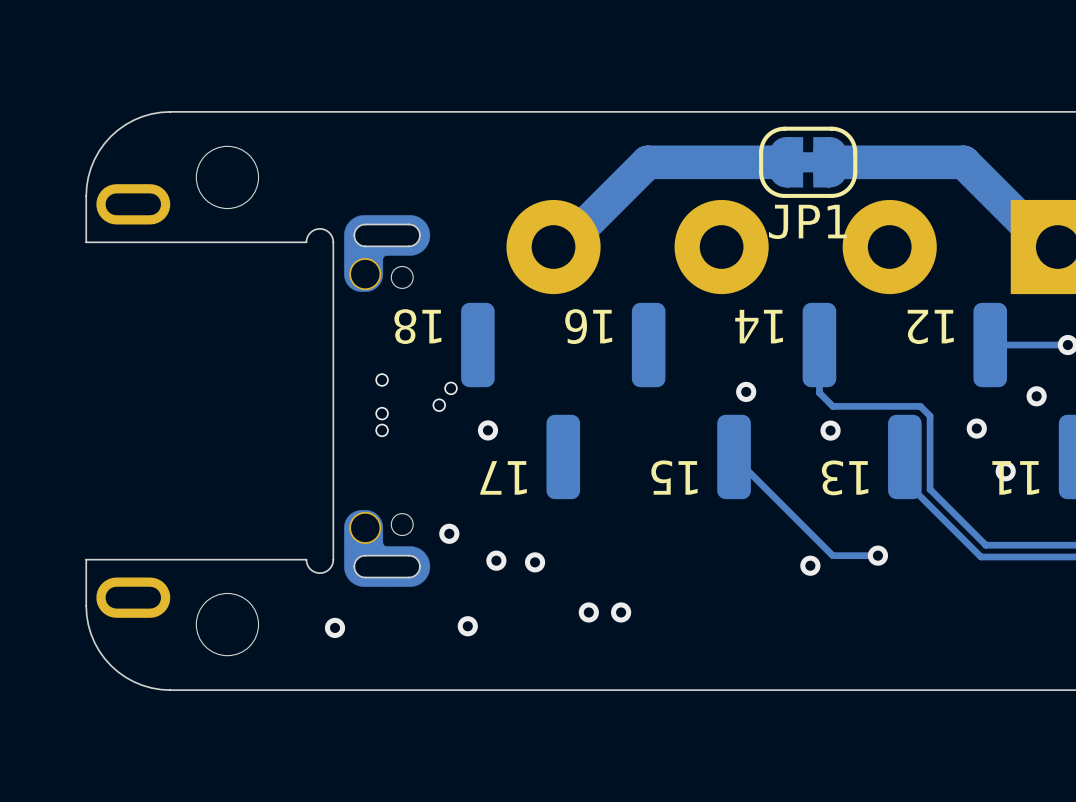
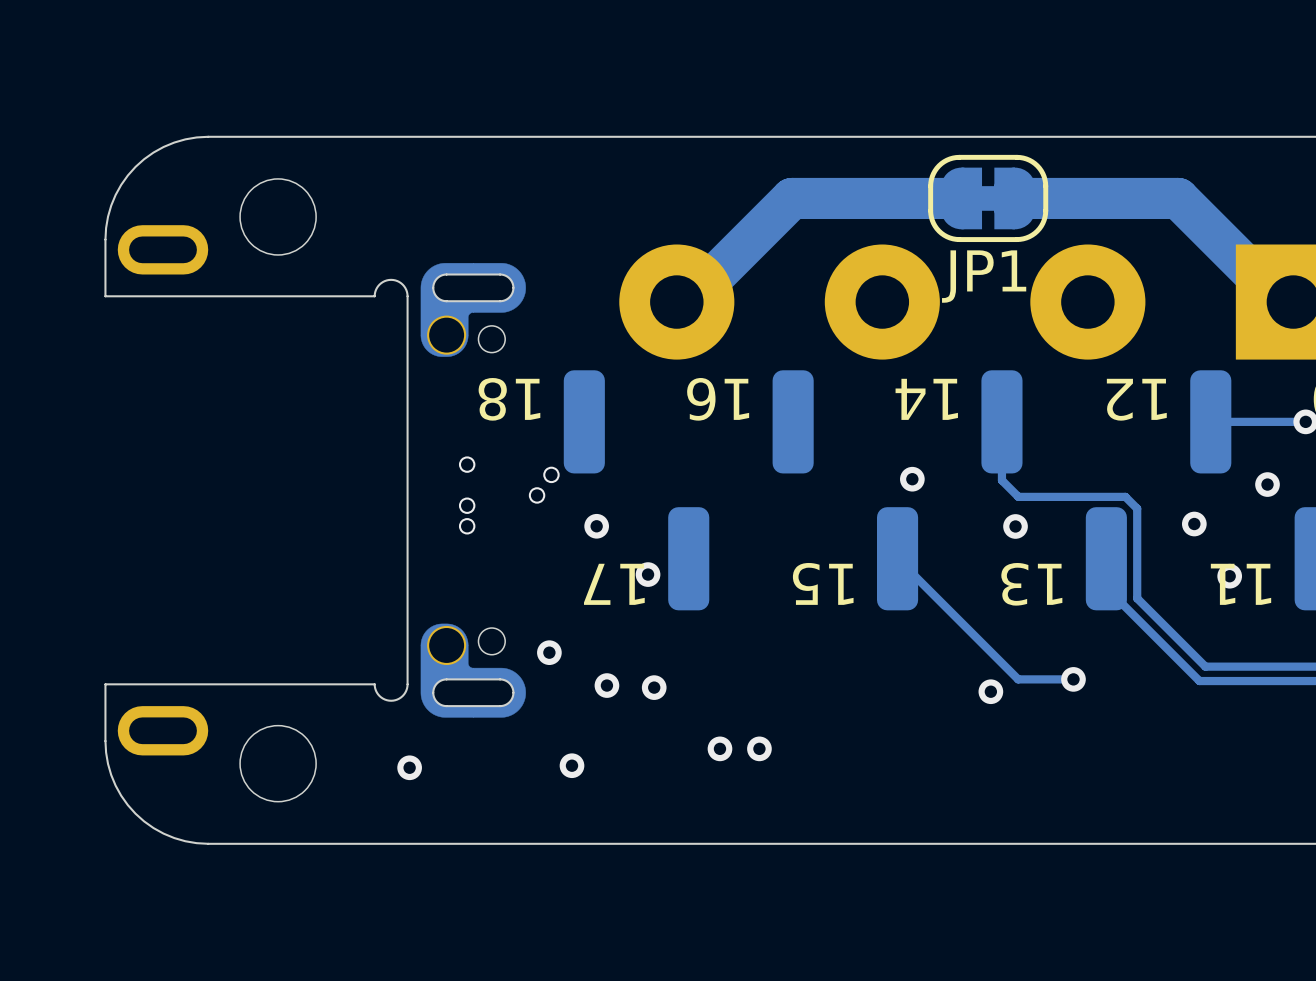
via: none -> (648, 574)

